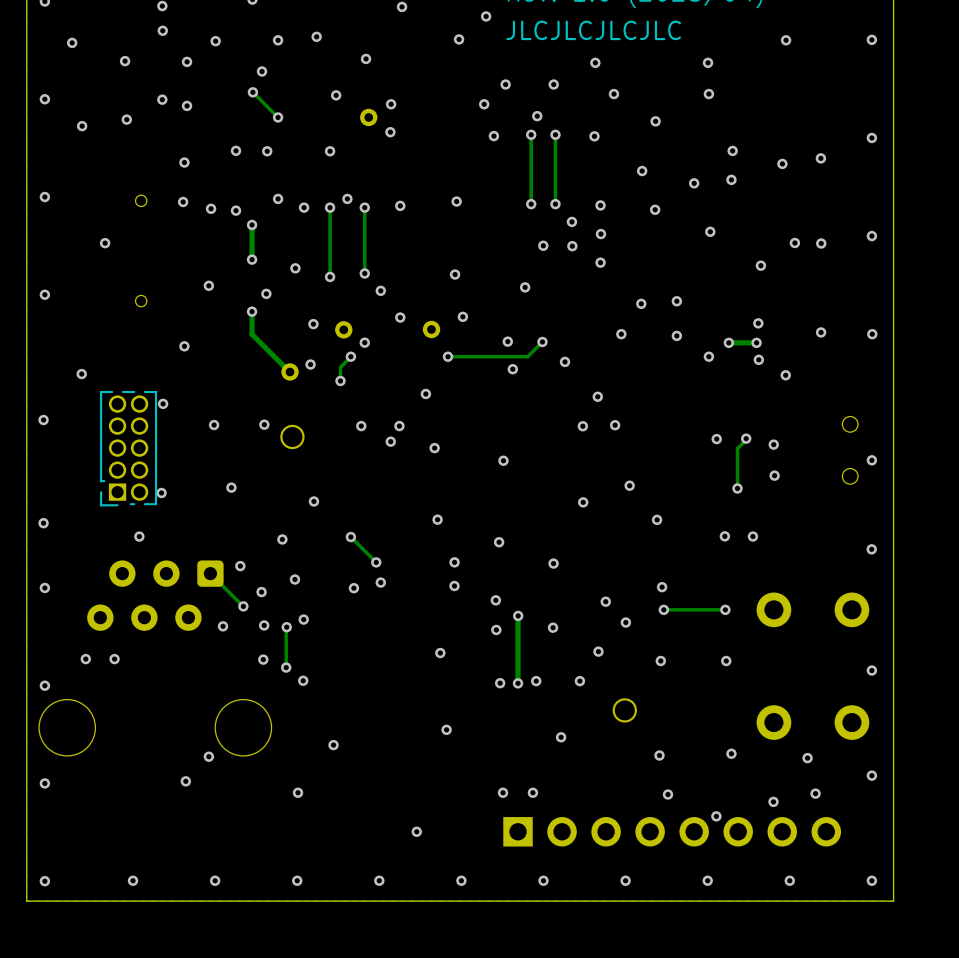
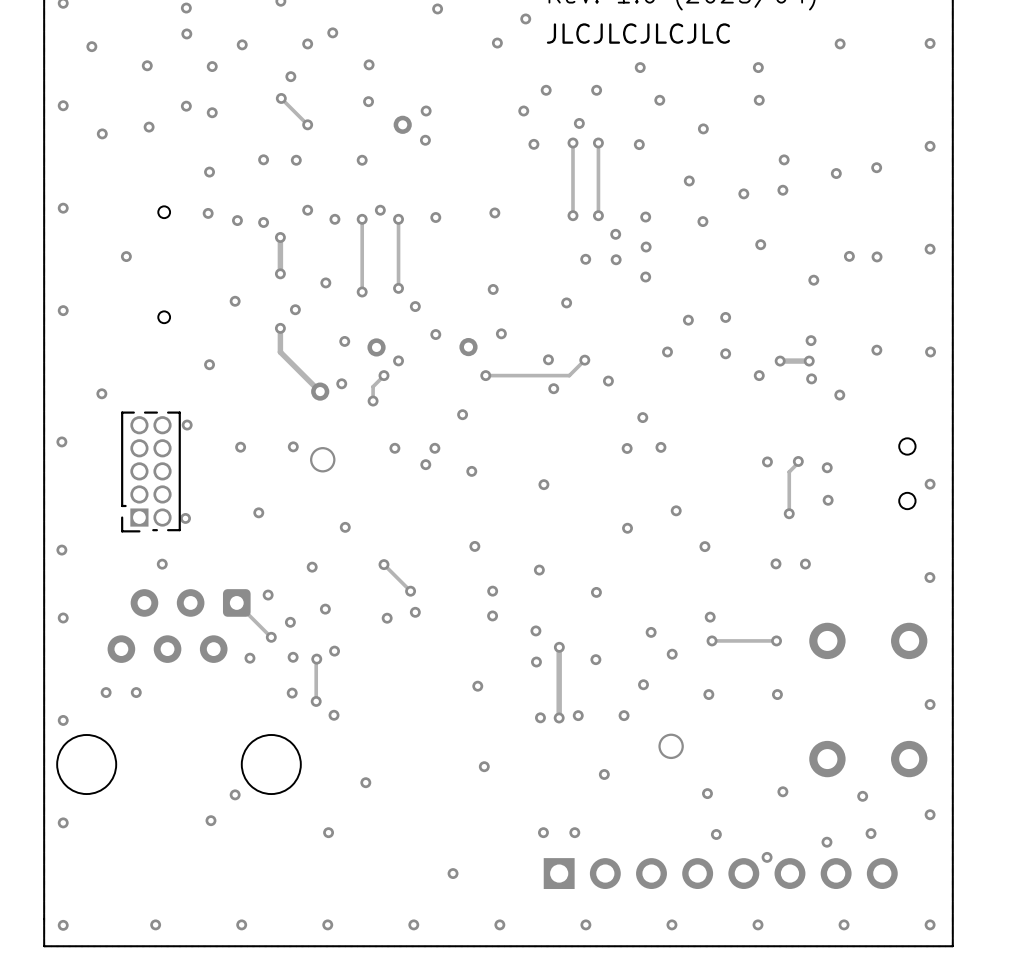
via: none -> (332, 32)
via: (316, 36) -> none
via: (366, 58) -> none
via: none -> (369, 64)

